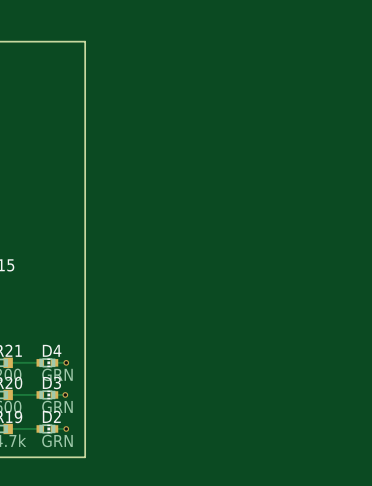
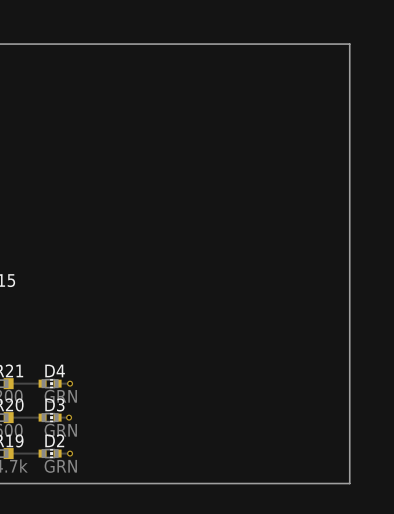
board edge: (85, 41) (85, 457) -> (90, 44) (349, 44) (349, 483) (90, 483)

